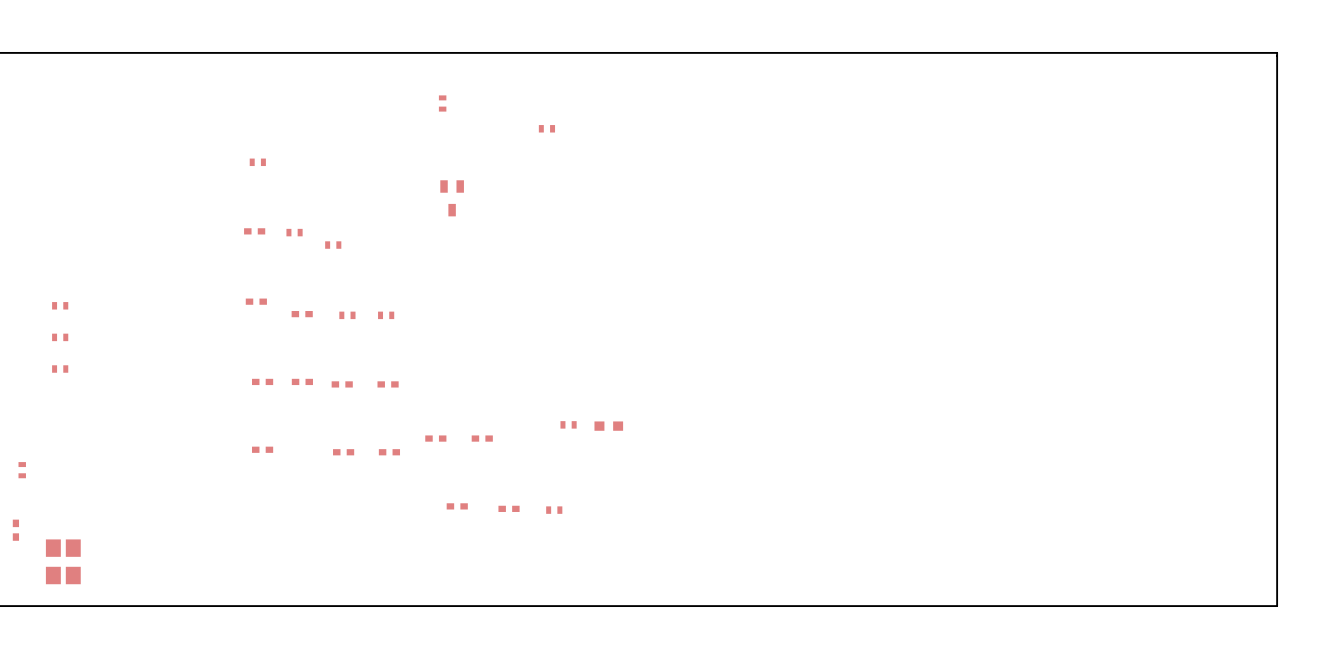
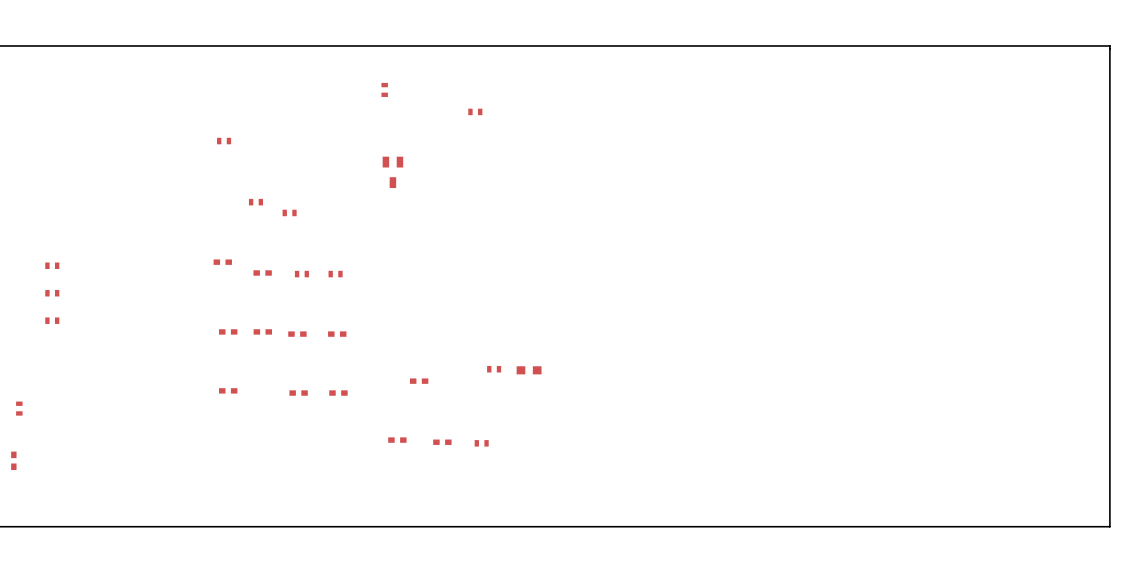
part: (254, 231) -> none
part: (435, 438) -> none
part: (63, 561) -> none

